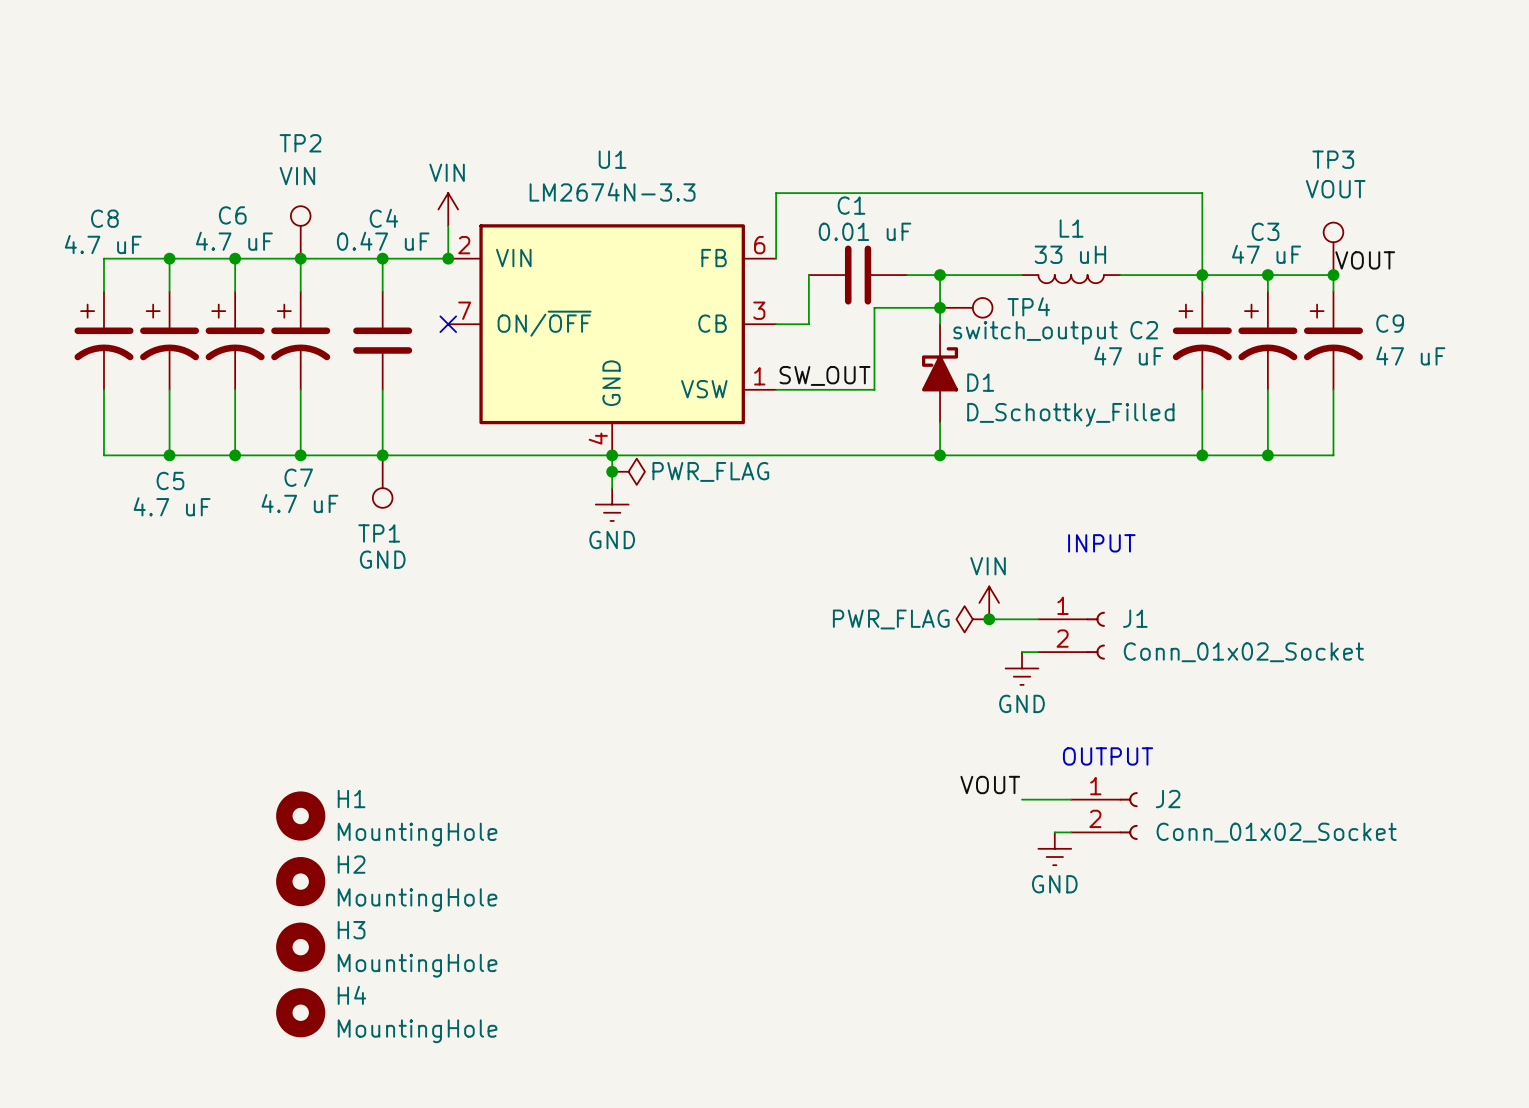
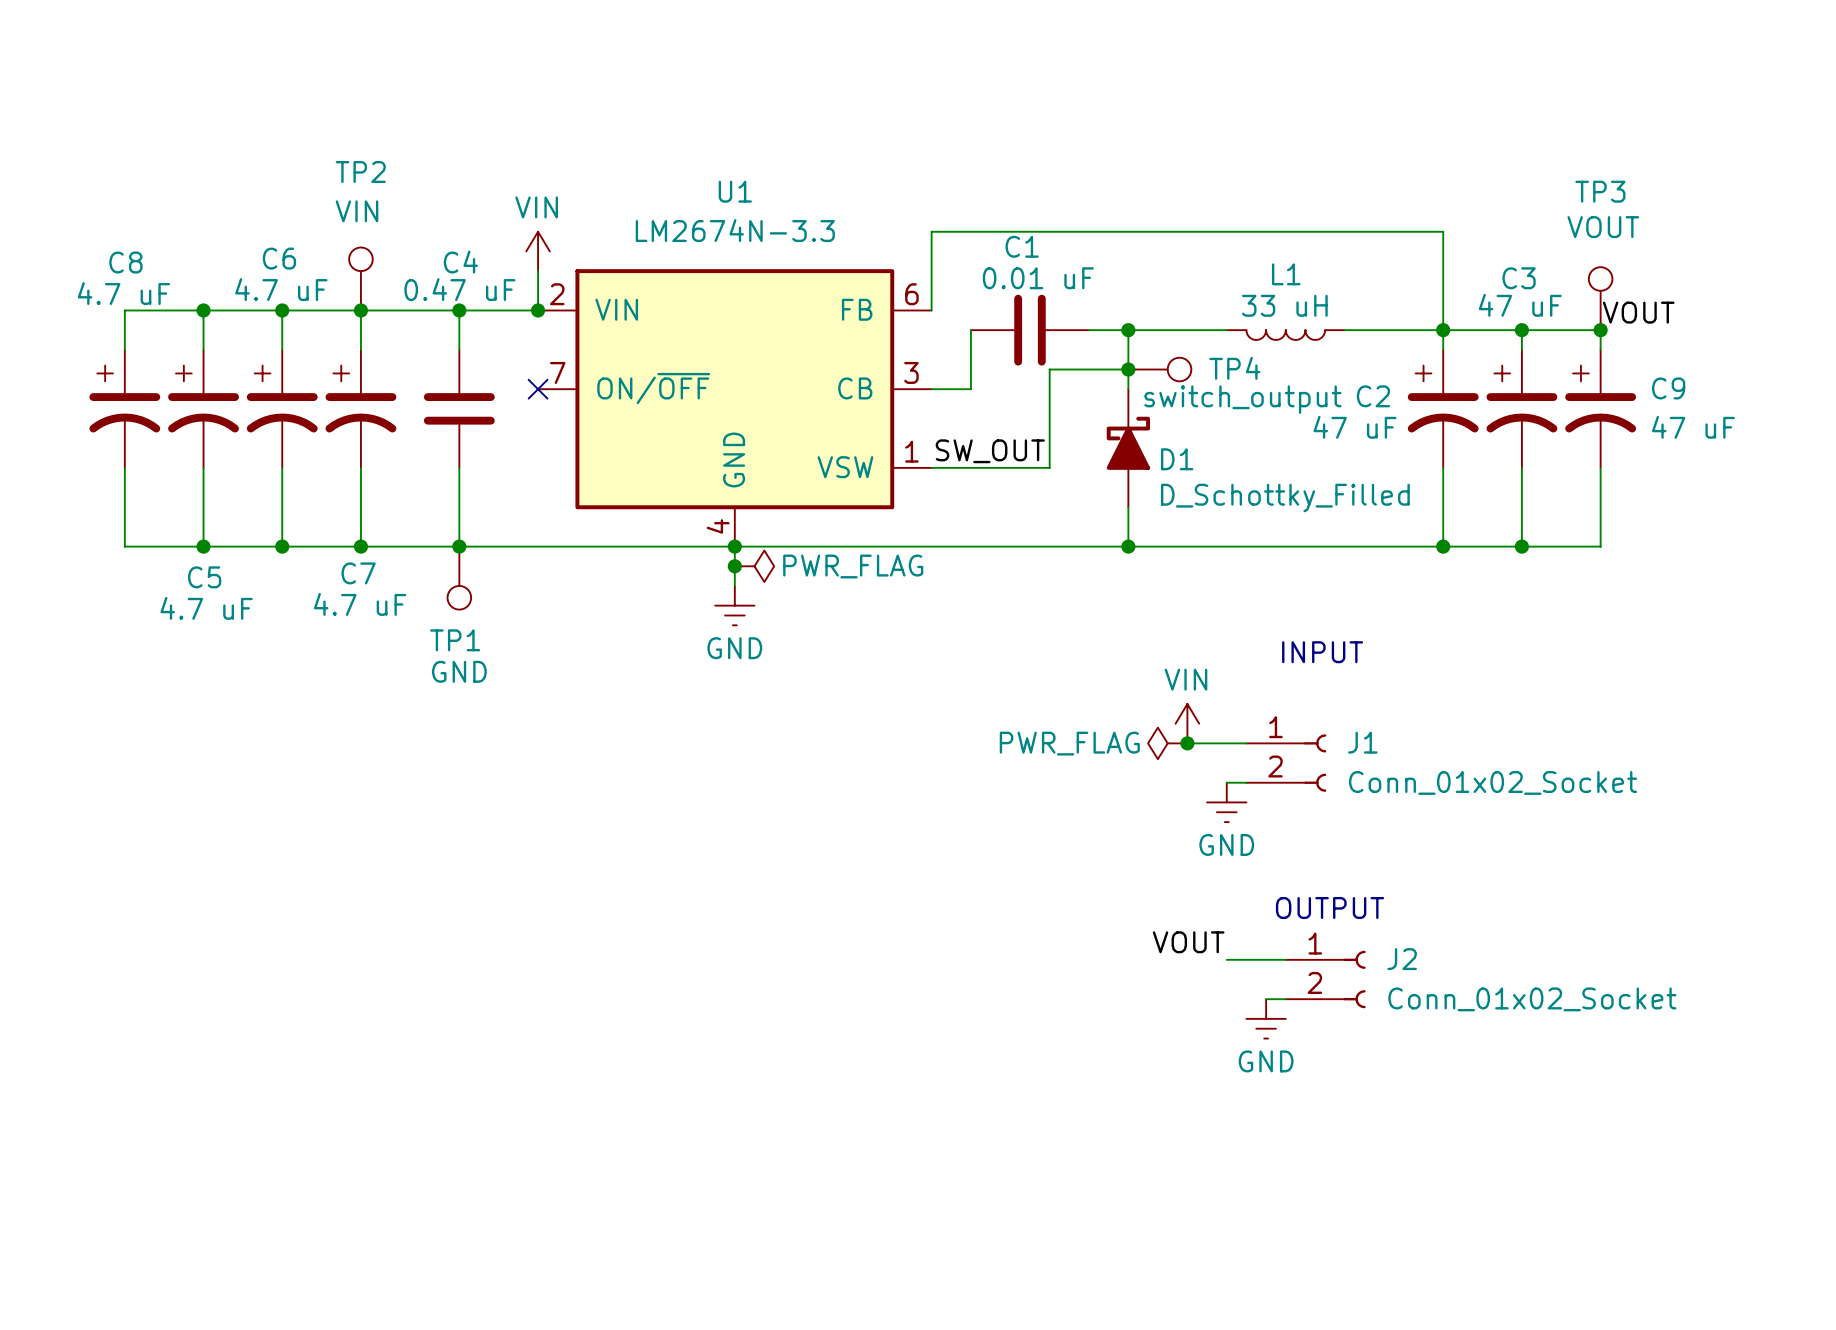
H1: MountingHole (300, 816) -> none
H2: MountingHole (300, 881) -> none
H3: MountingHole (300, 947) -> none
H4: MountingHole (300, 1012) -> none

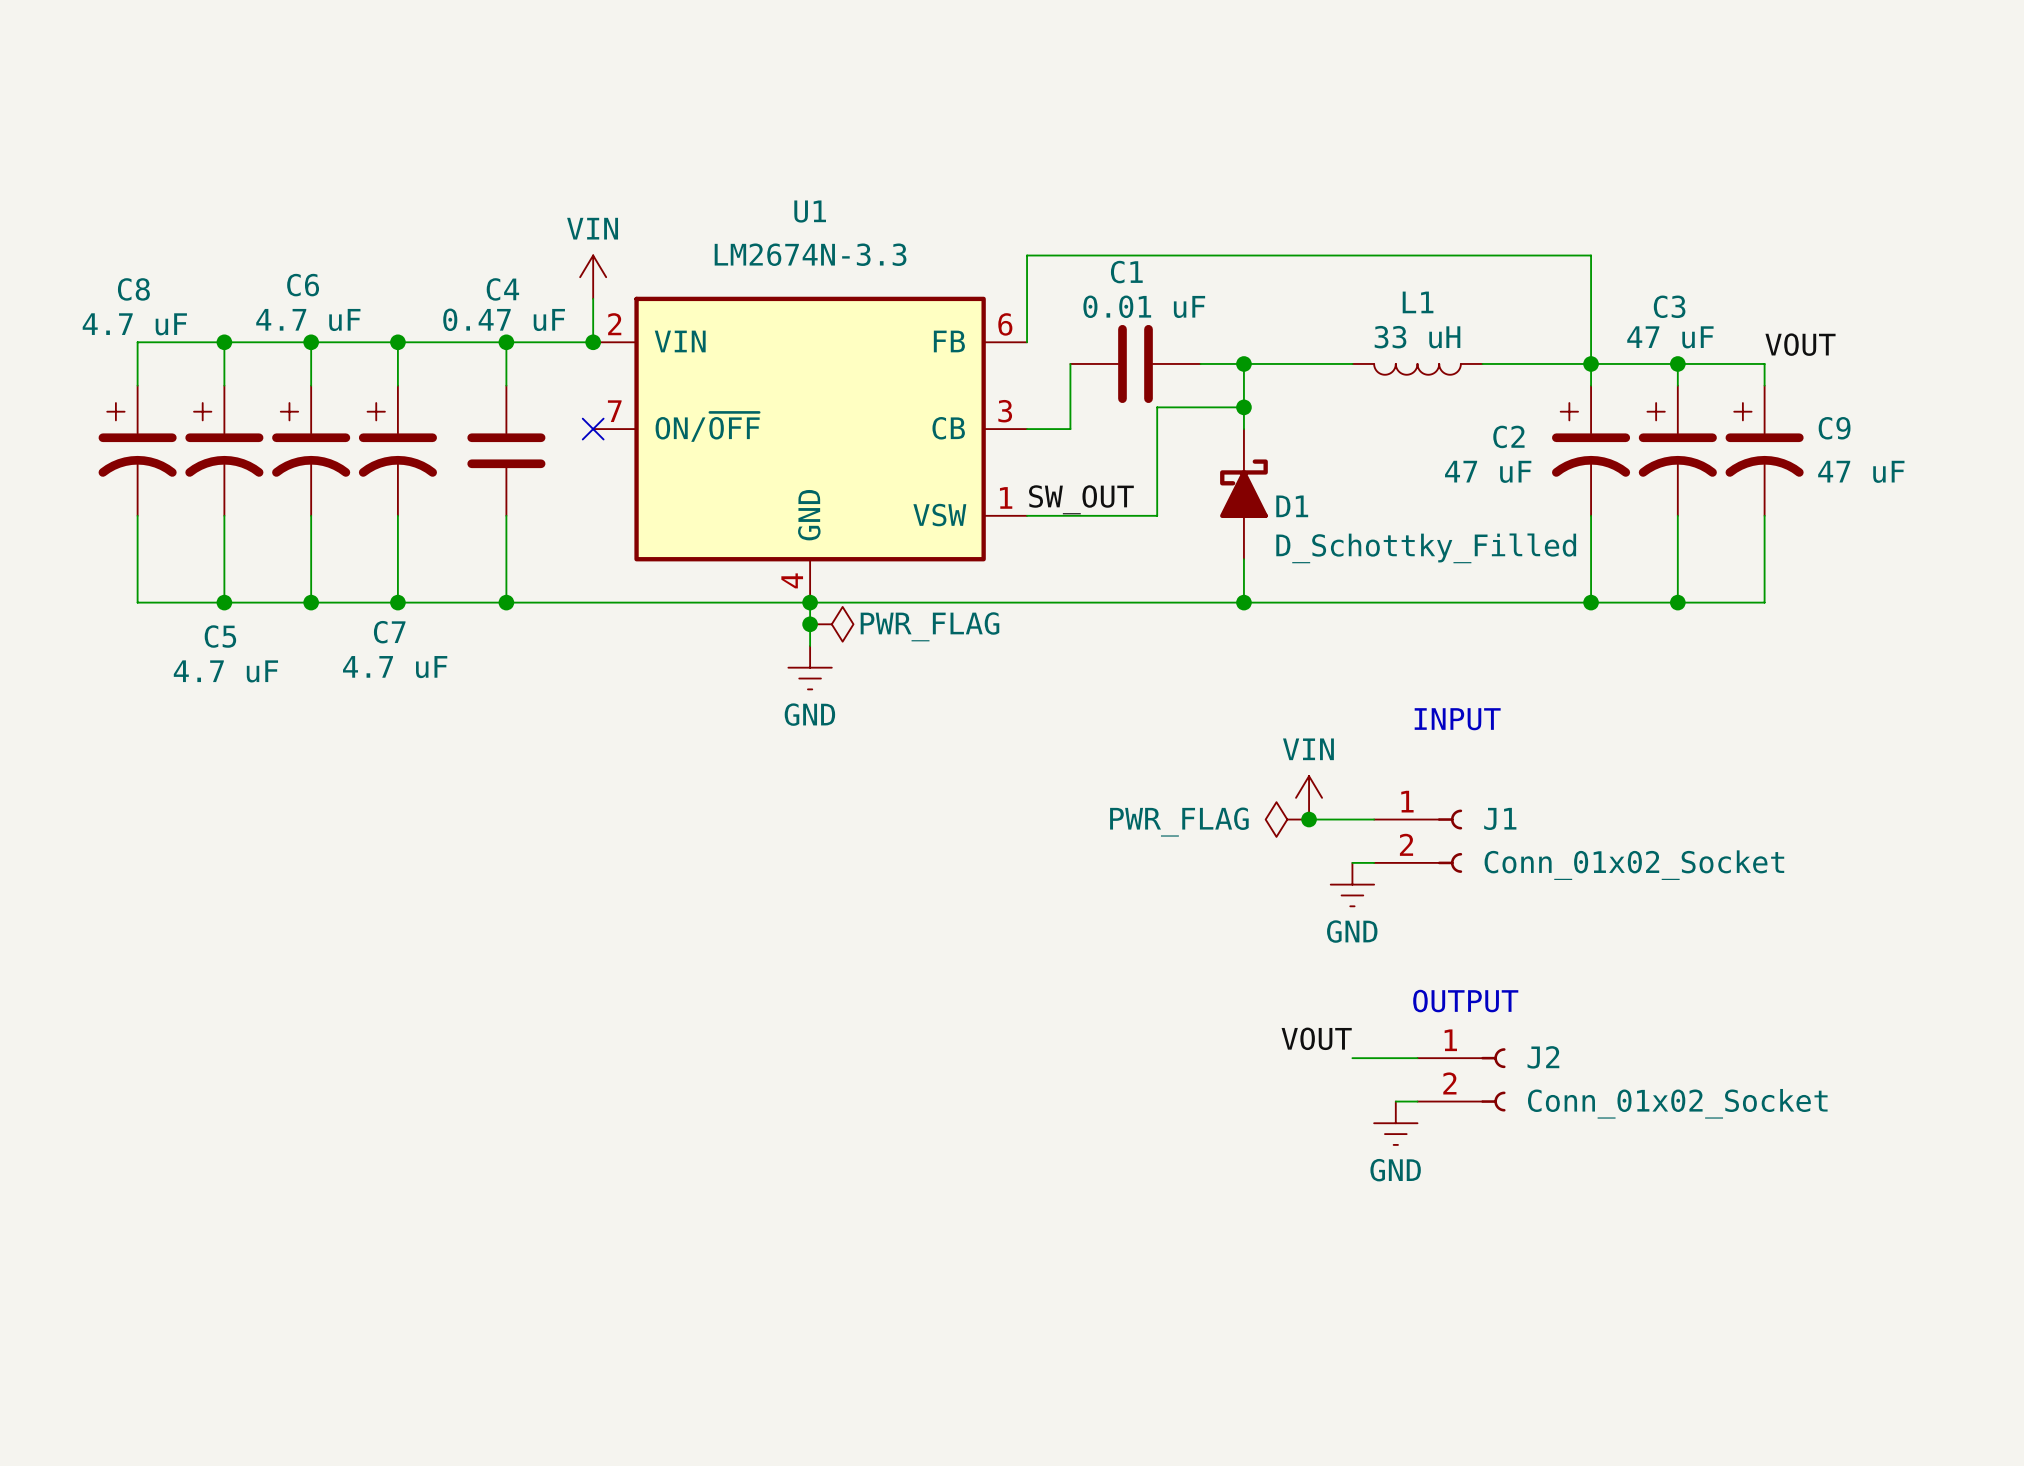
TP2: VIN (360, 279) -> none
TP3: VOUT (1600, 298) -> none
junction: (1600, 330) -> none
TP4: switch_output (1159, 369) -> none
TP1: GND (459, 578) -> none

